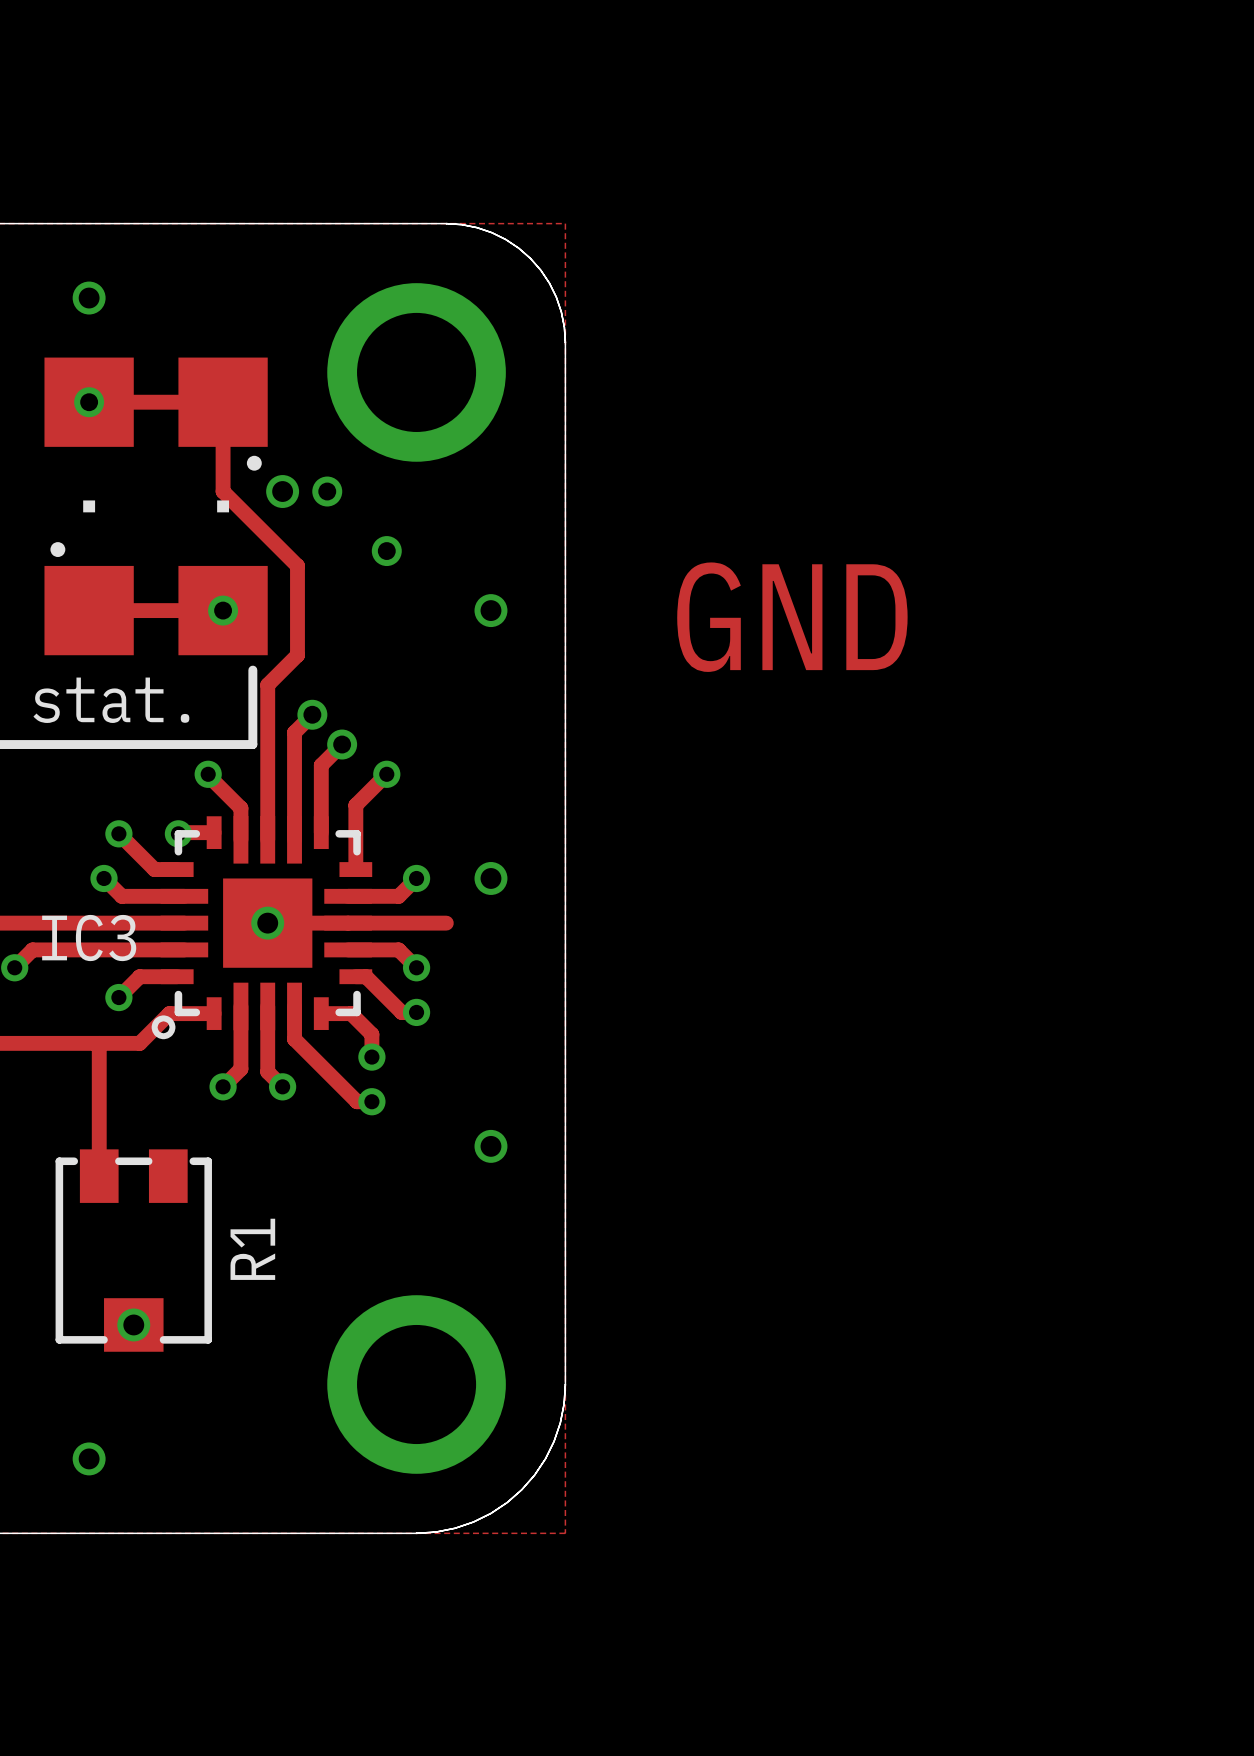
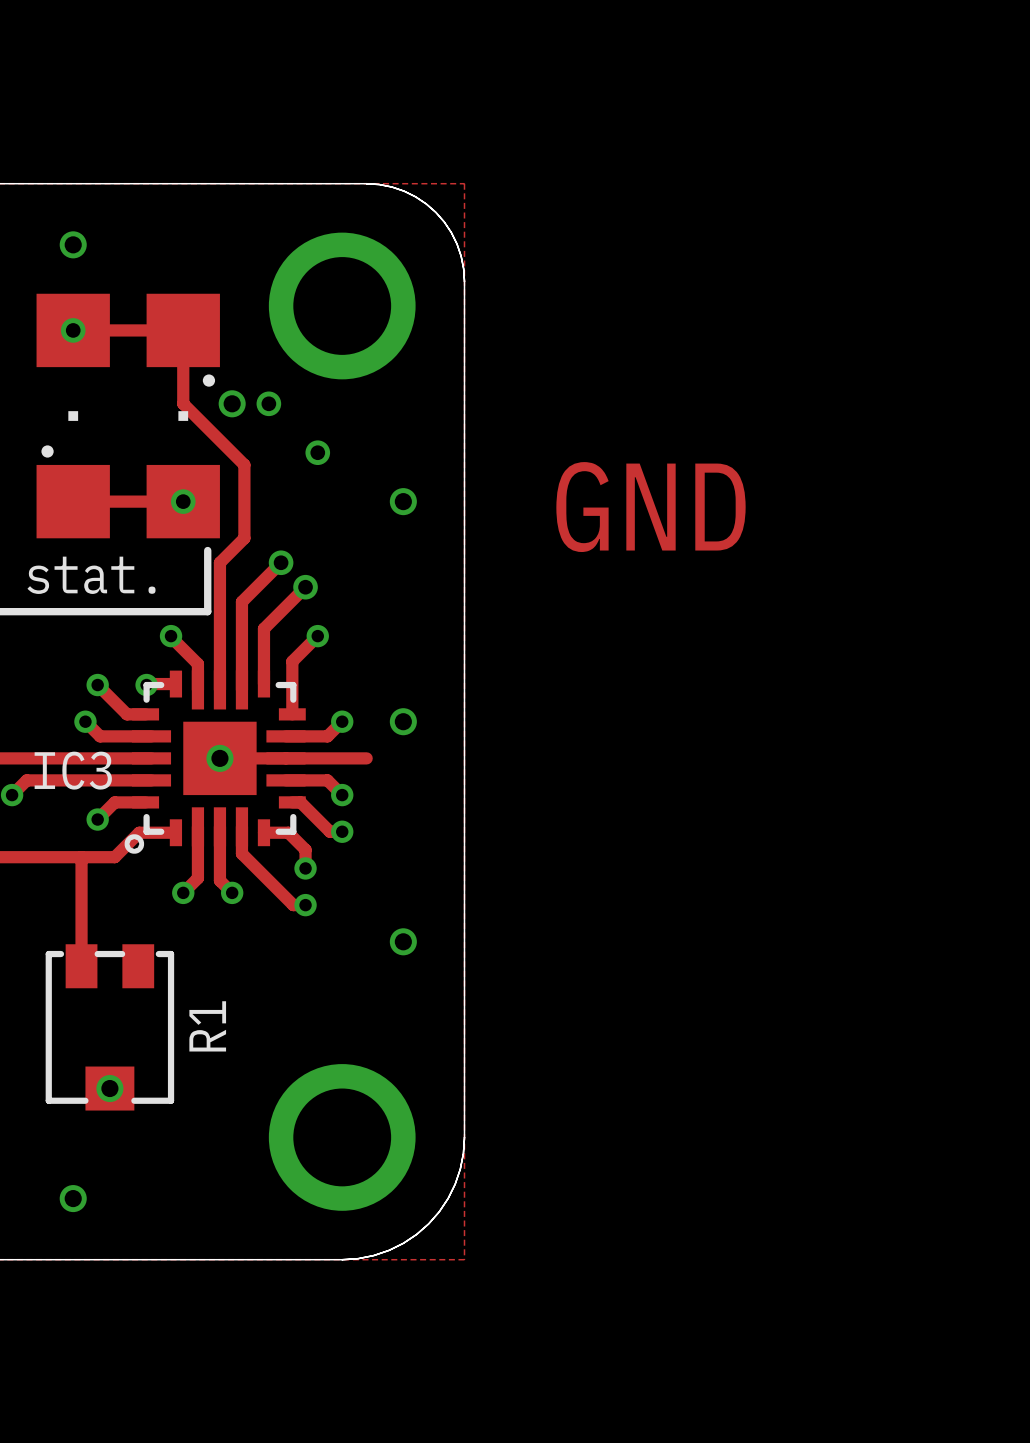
track: none -> (281, 562) (256, 587)
via position: (312, 714) -> (281, 562)
track: none -> (305, 587) (281, 611)
via position: (342, 744) -> (305, 587)

